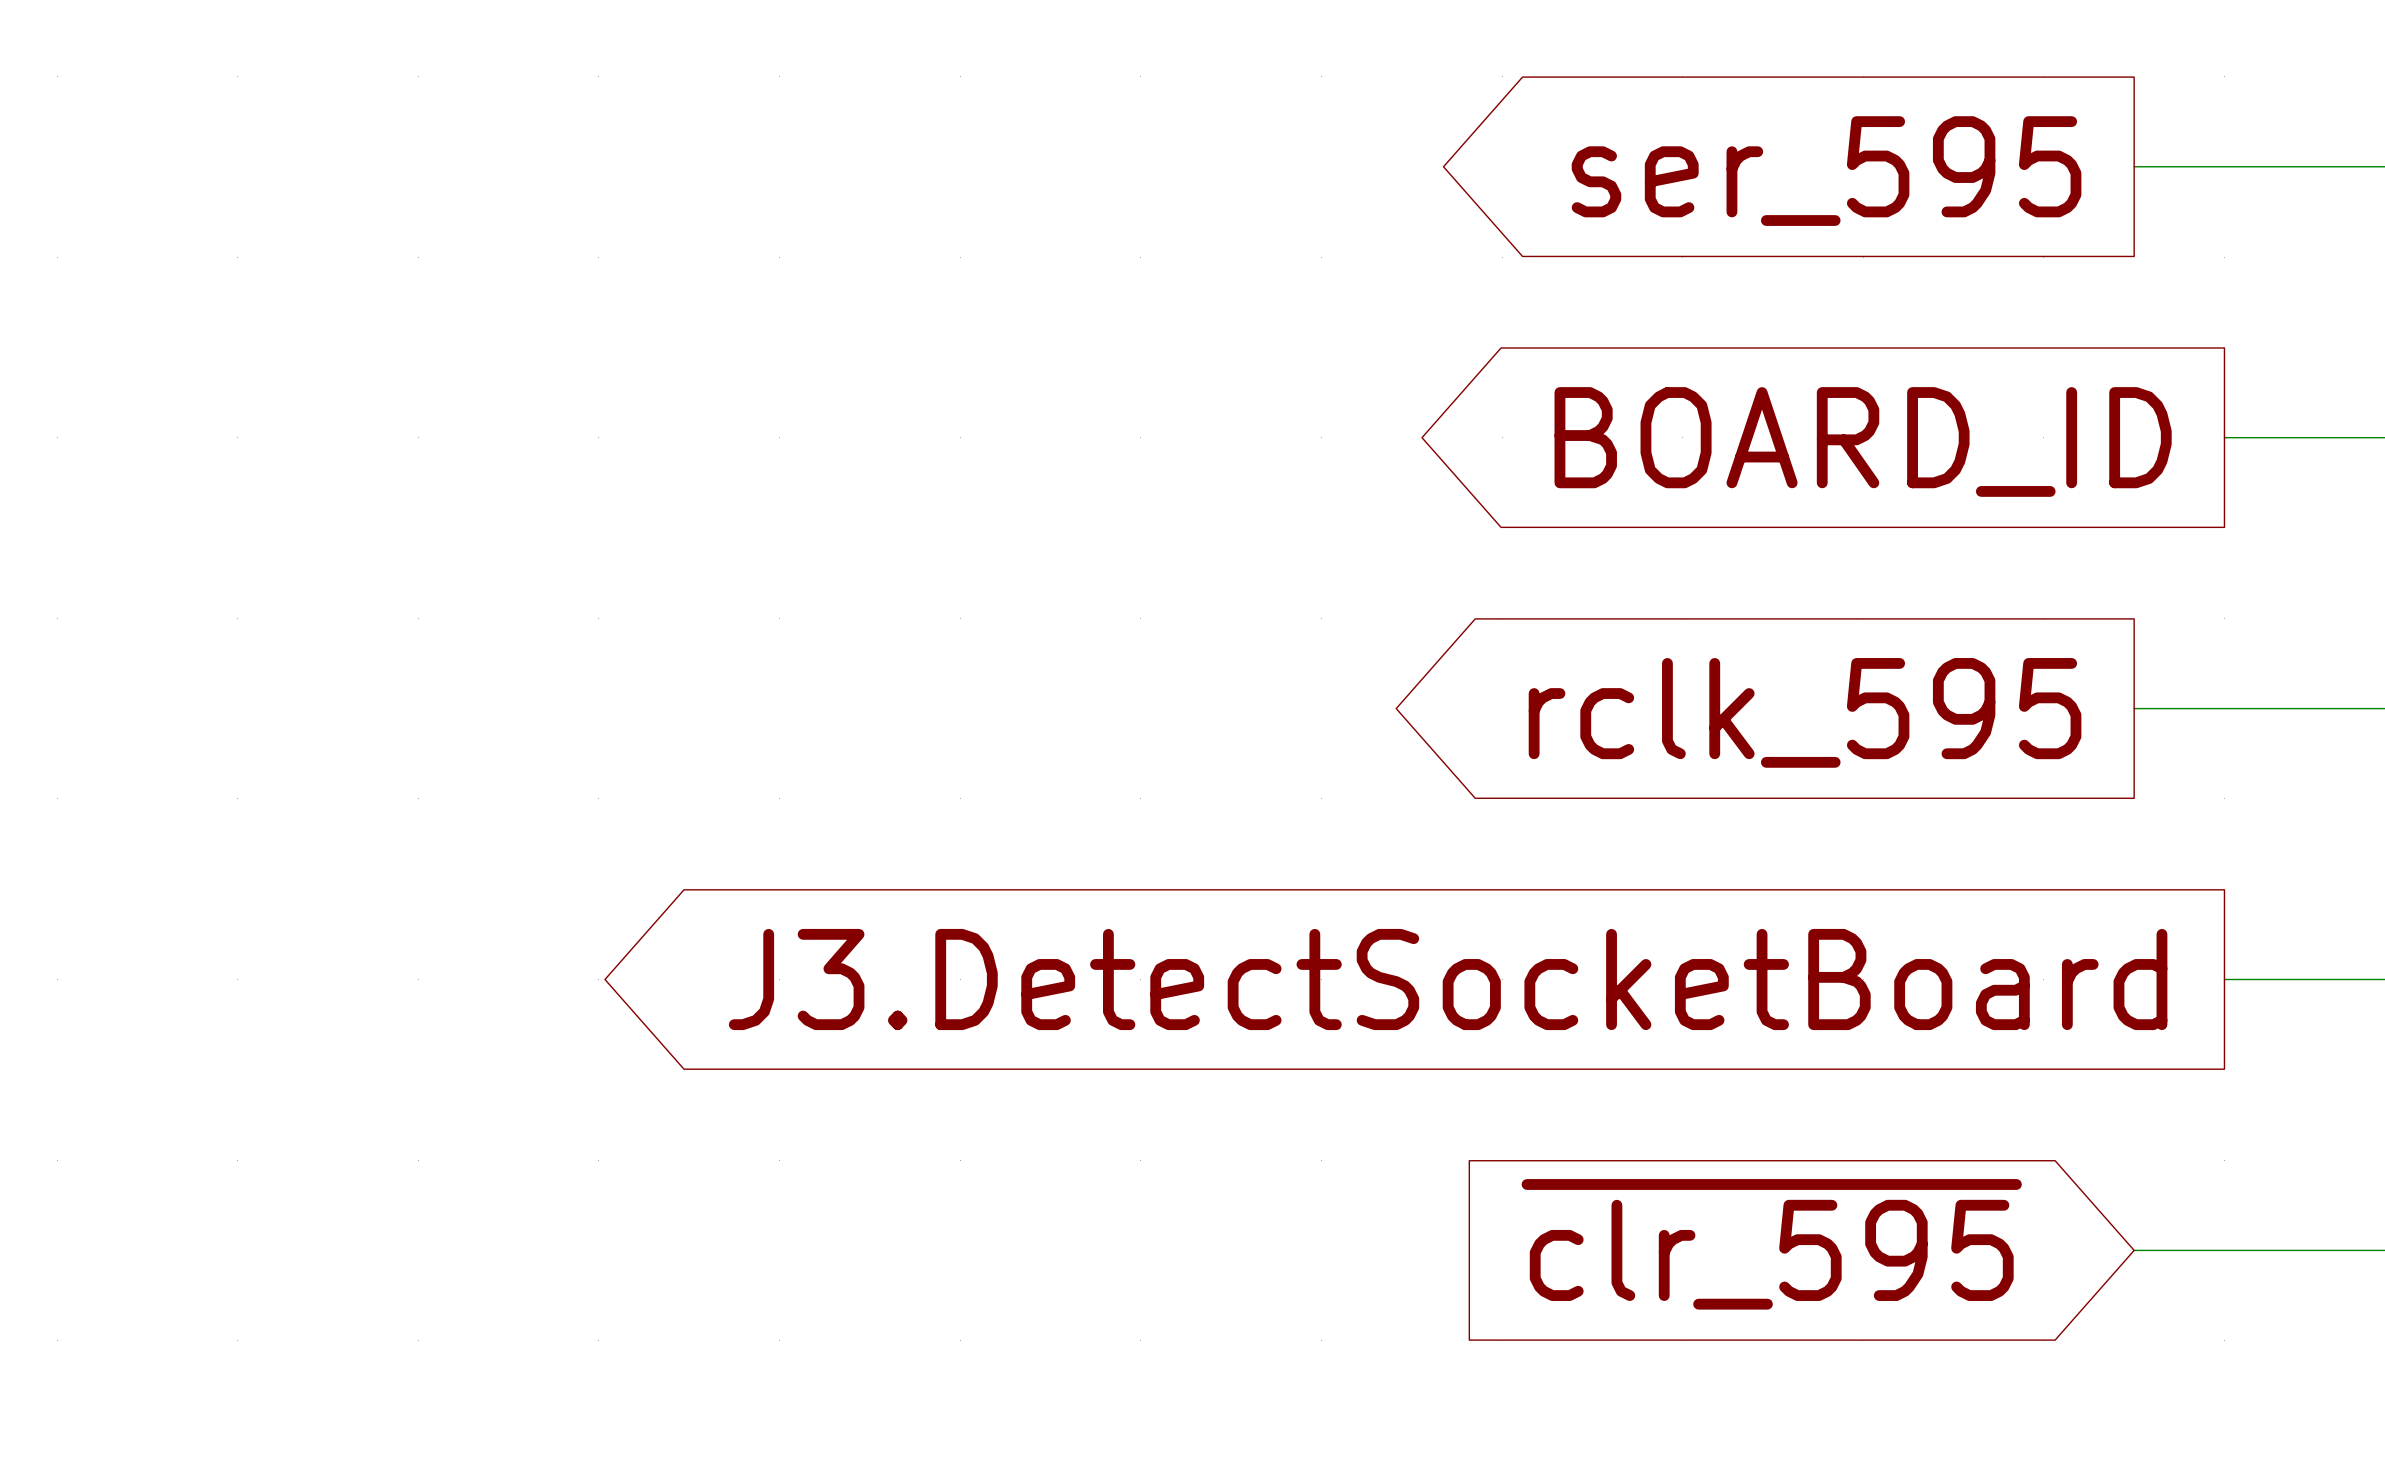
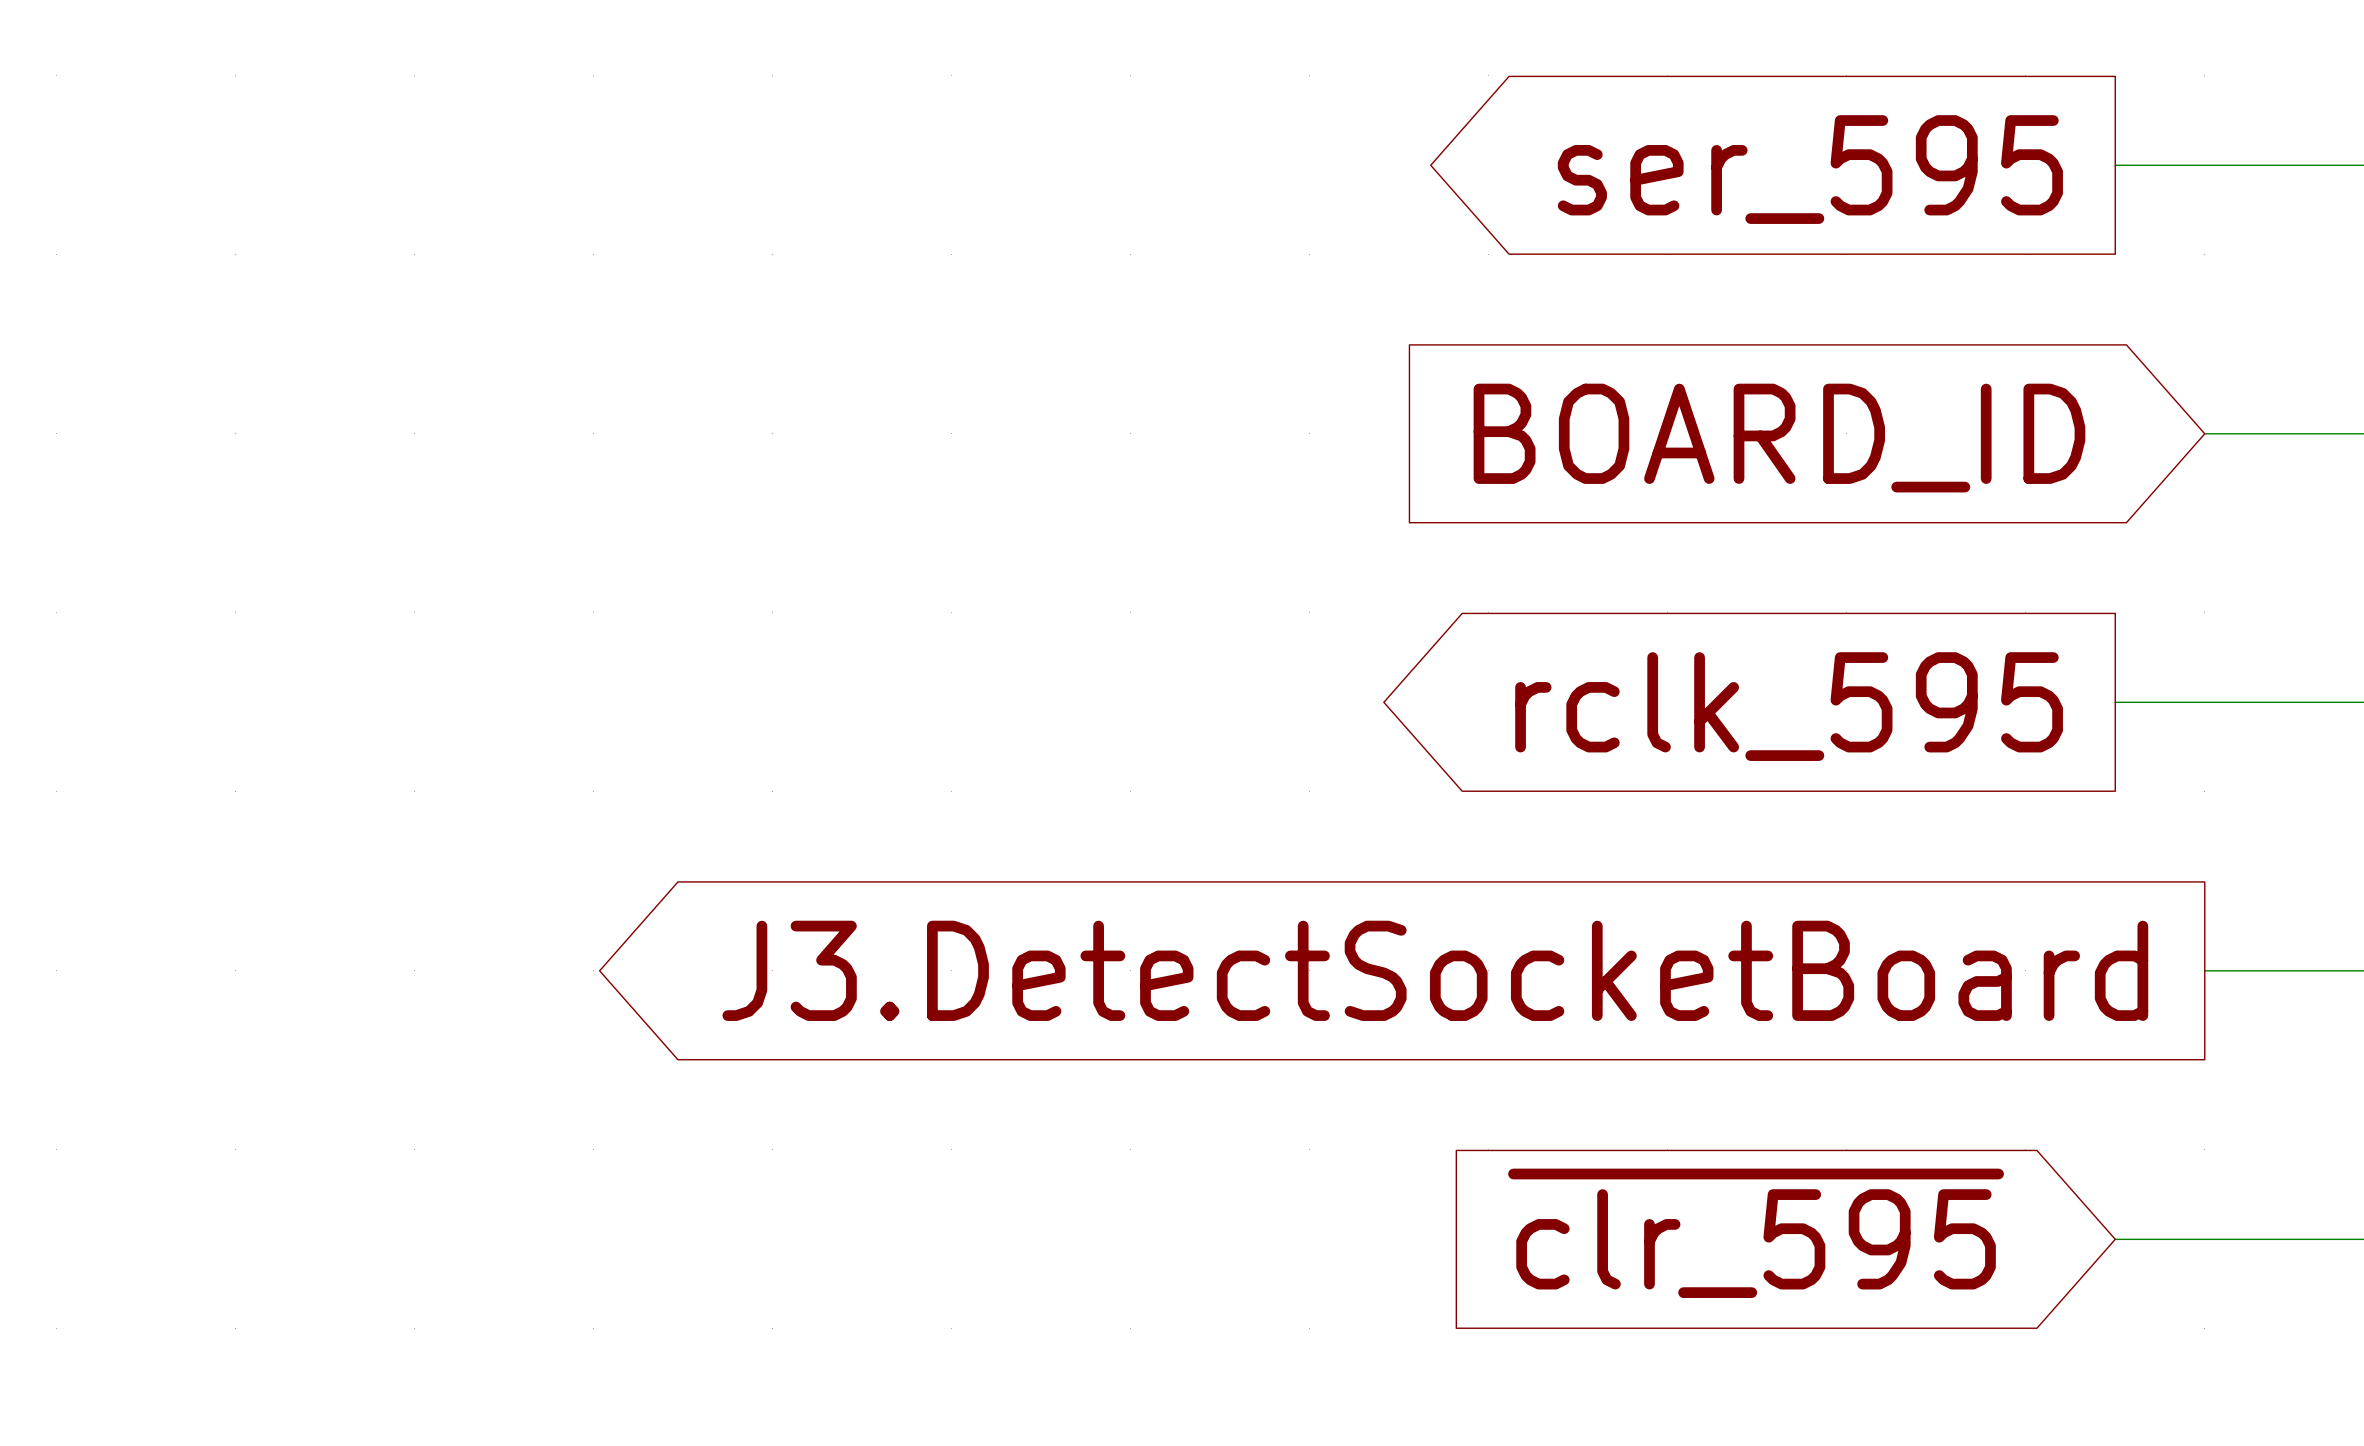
global label shape: output (1863, 441) -> input (1779, 438)

